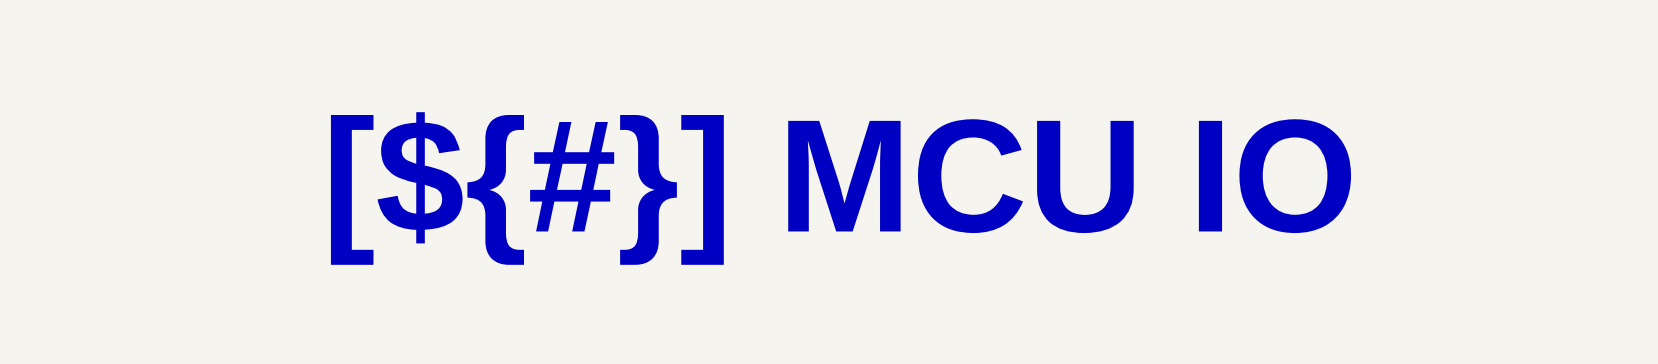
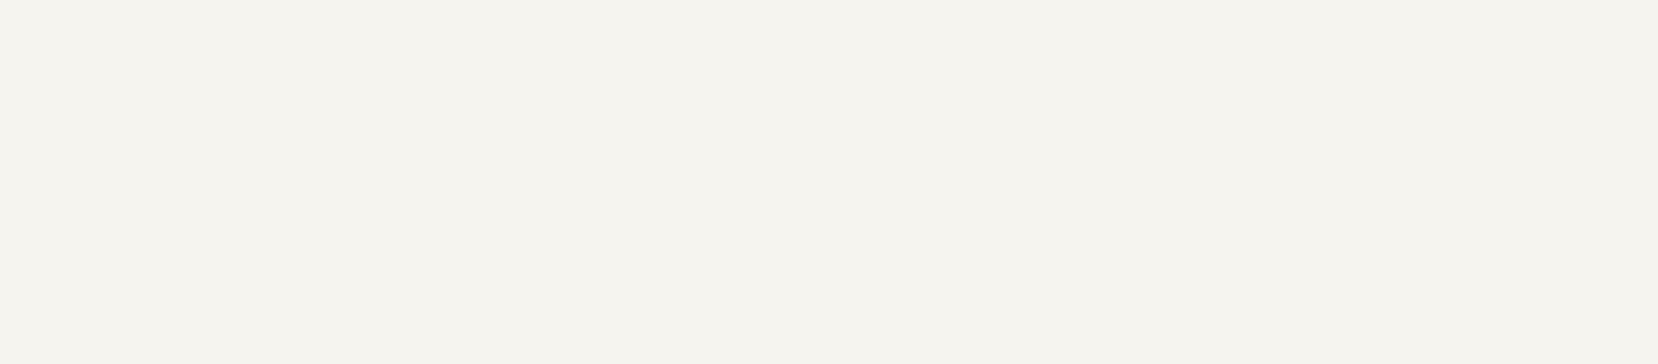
text: [${#}] MCU IO (841, 188) -> none

